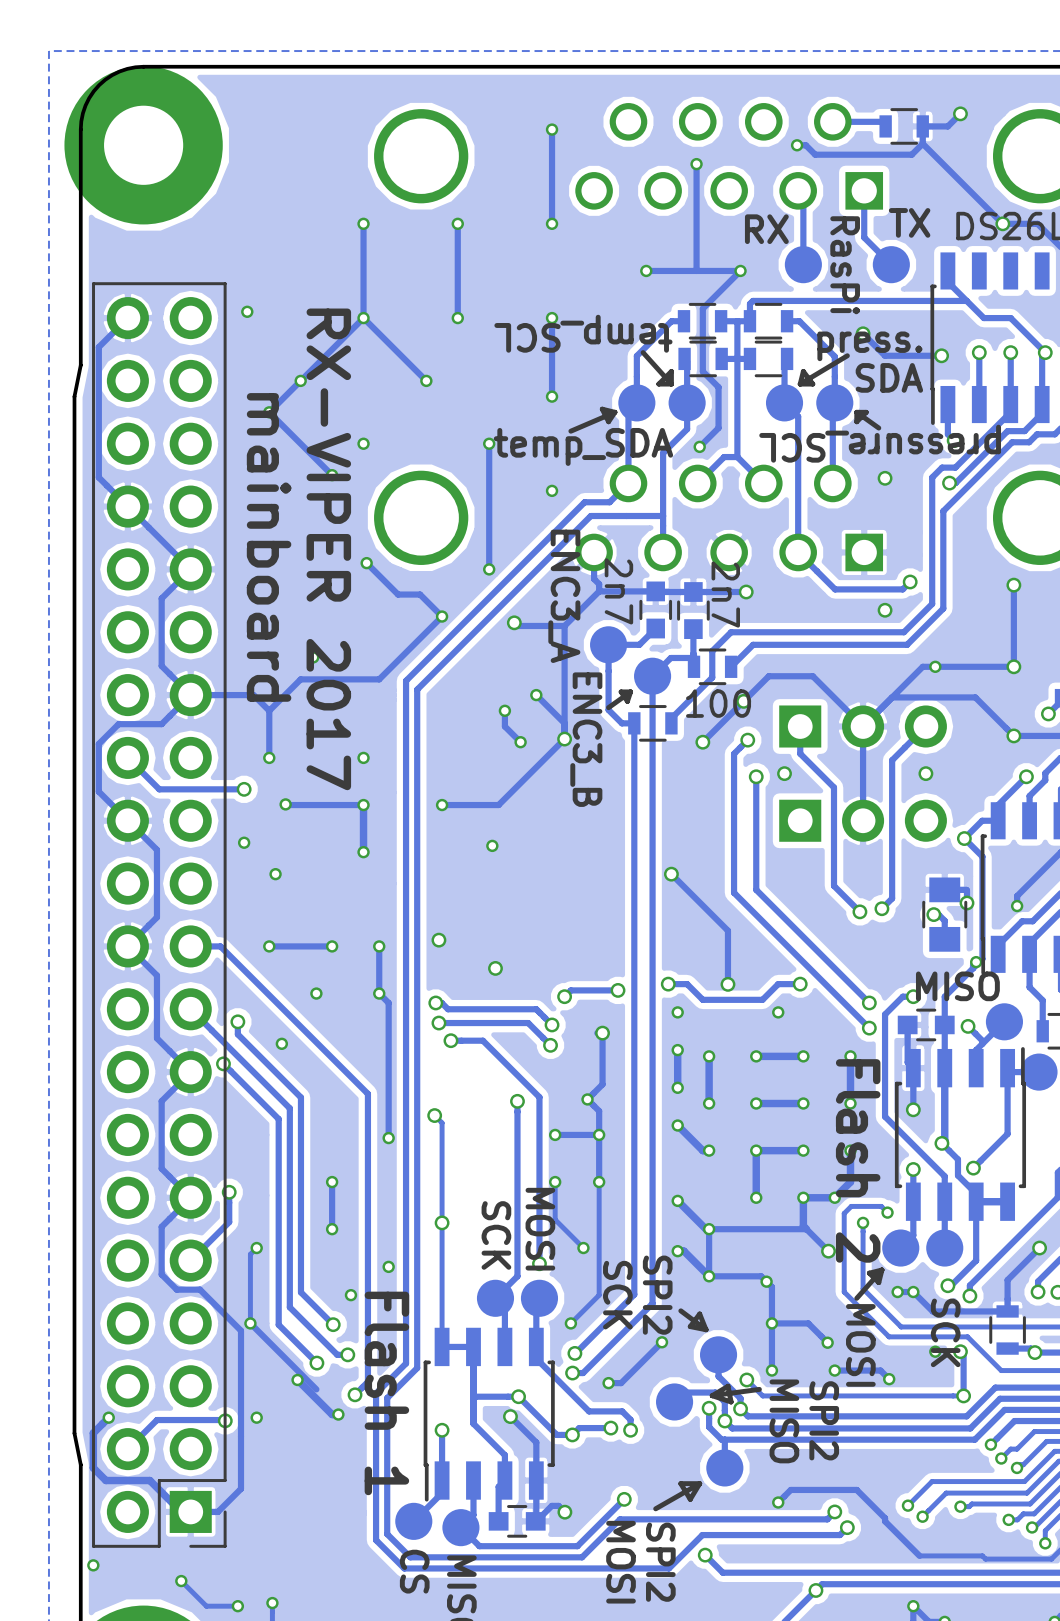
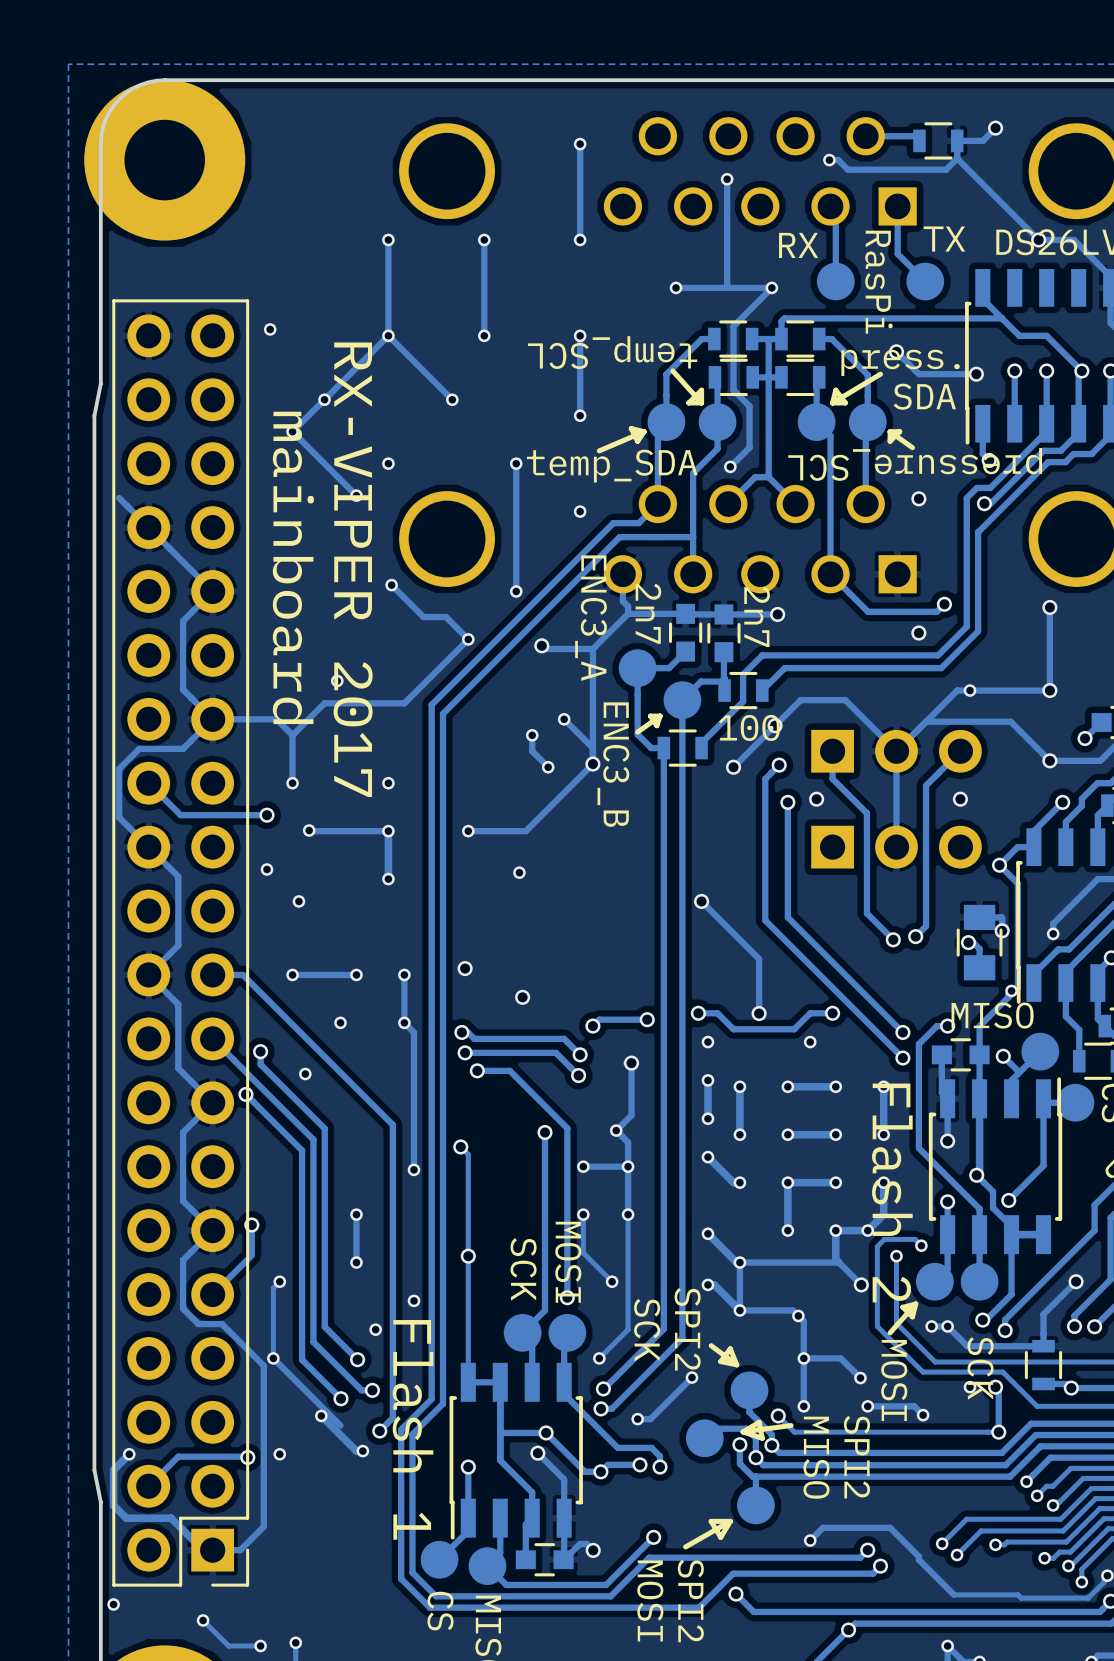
track: (127, 318) (98, 347) (98, 477) -> none

